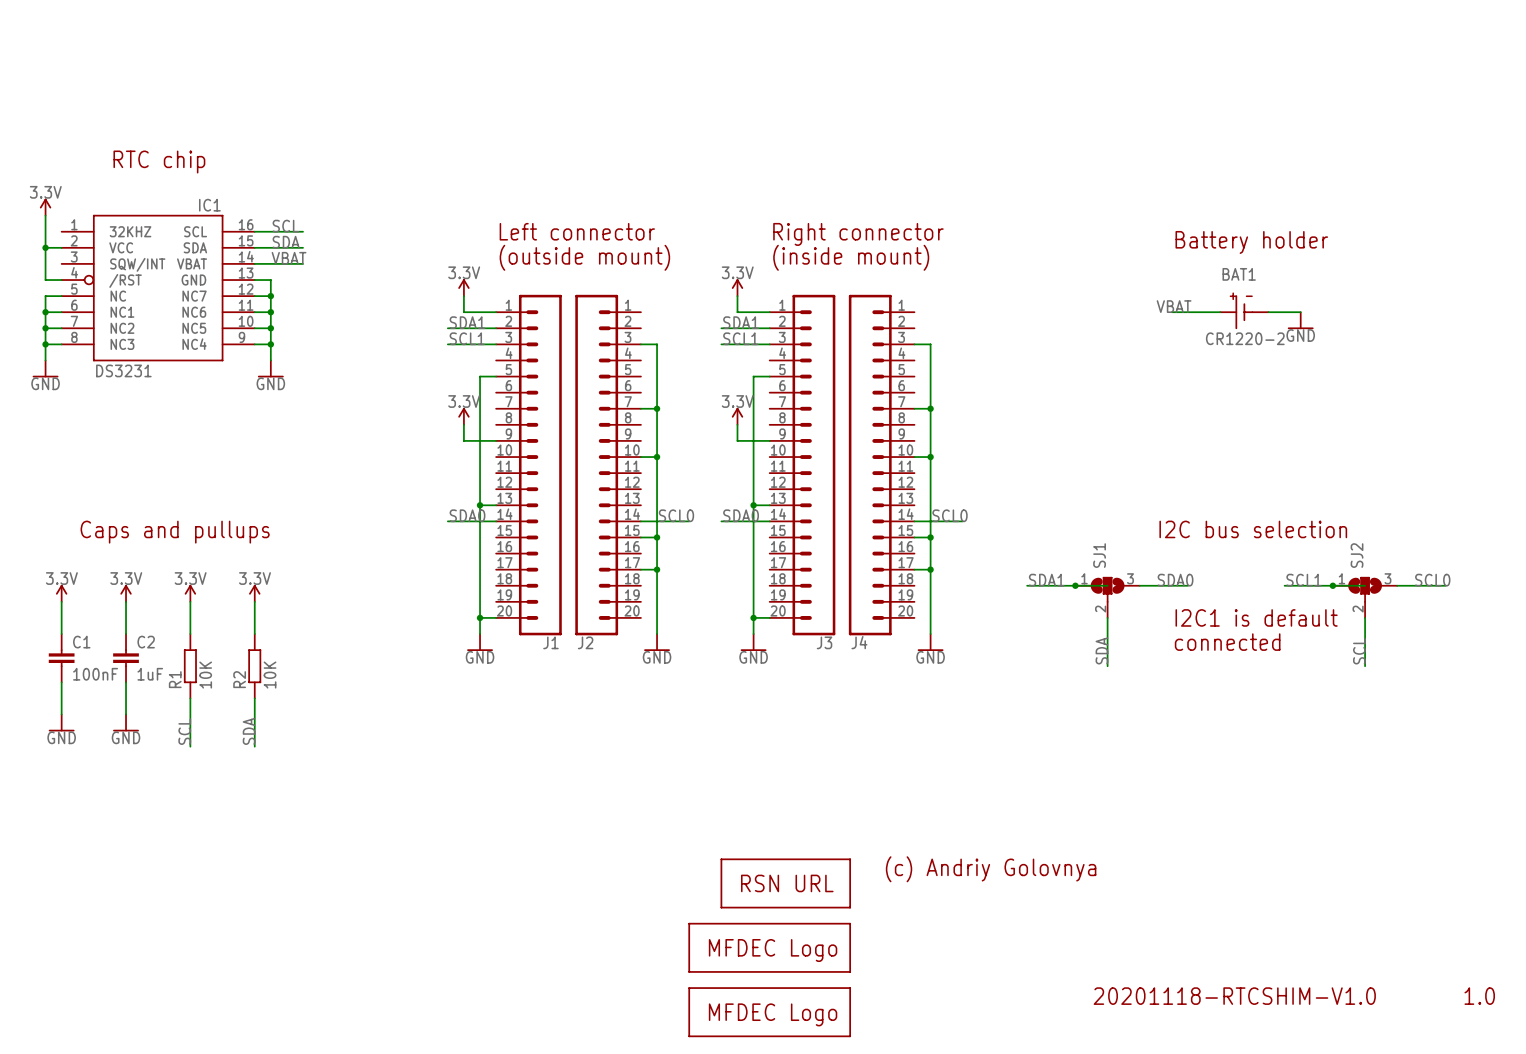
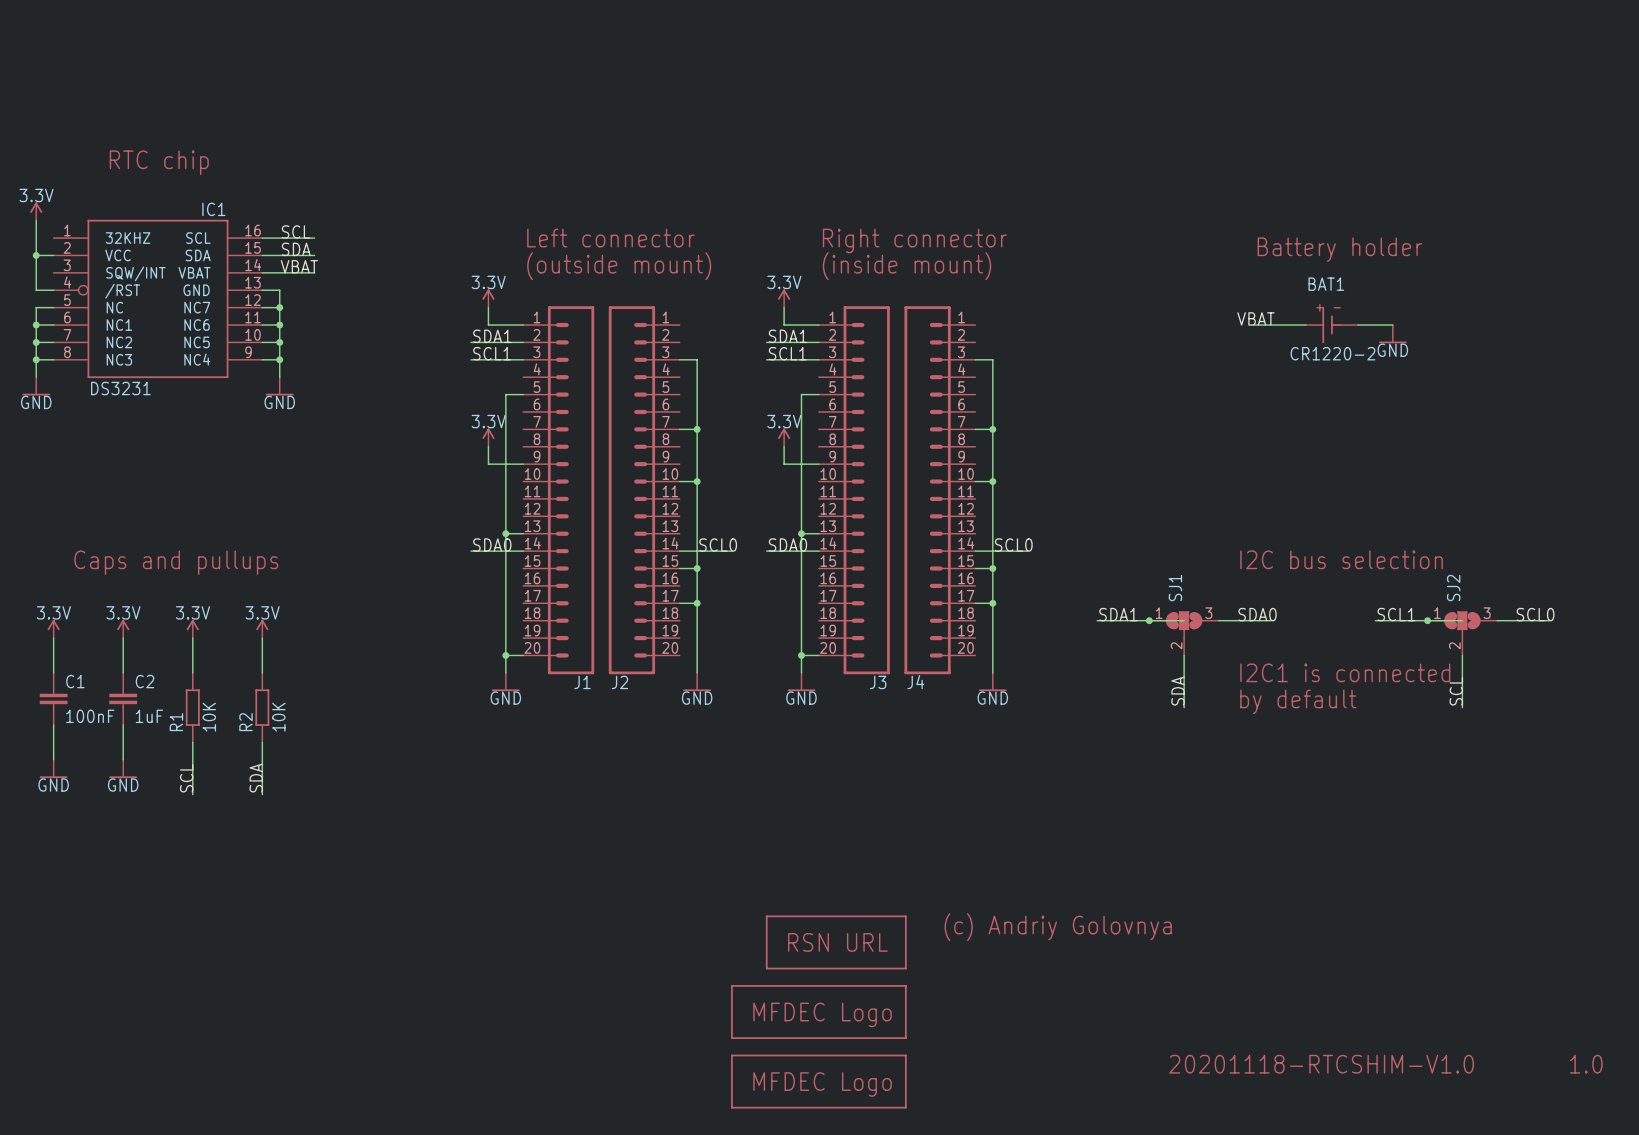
text: I2C1 is default (1256, 617) -> none
text: connected (1227, 642) -> I2C1 is connected (1345, 672)
text: none -> by default (1298, 701)

